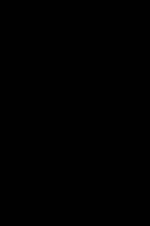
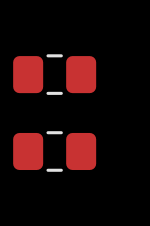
part: none -> (54, 74)
part: none -> (54, 151)

